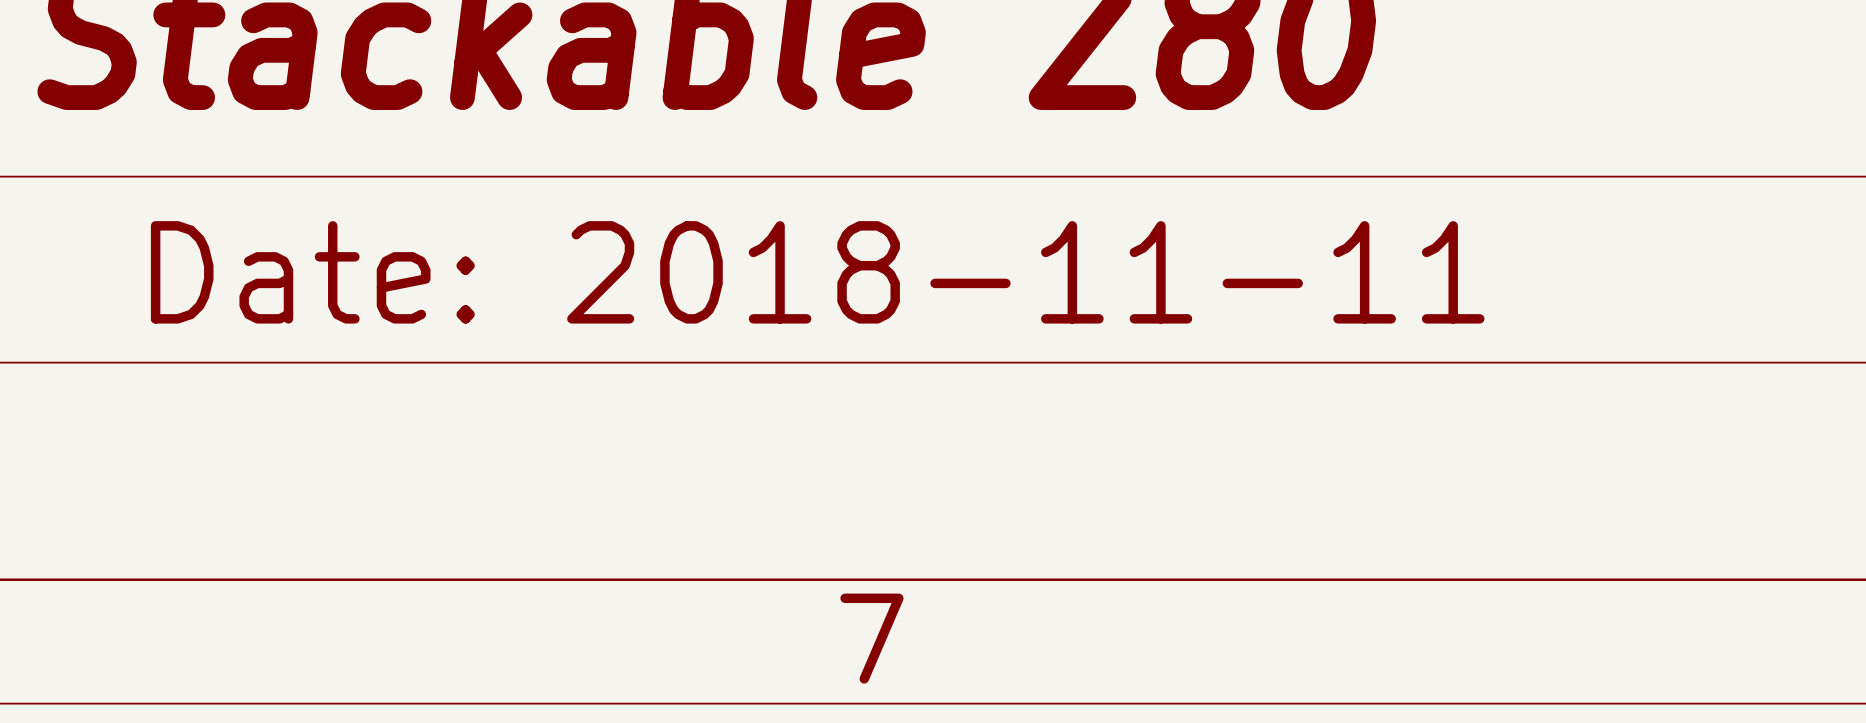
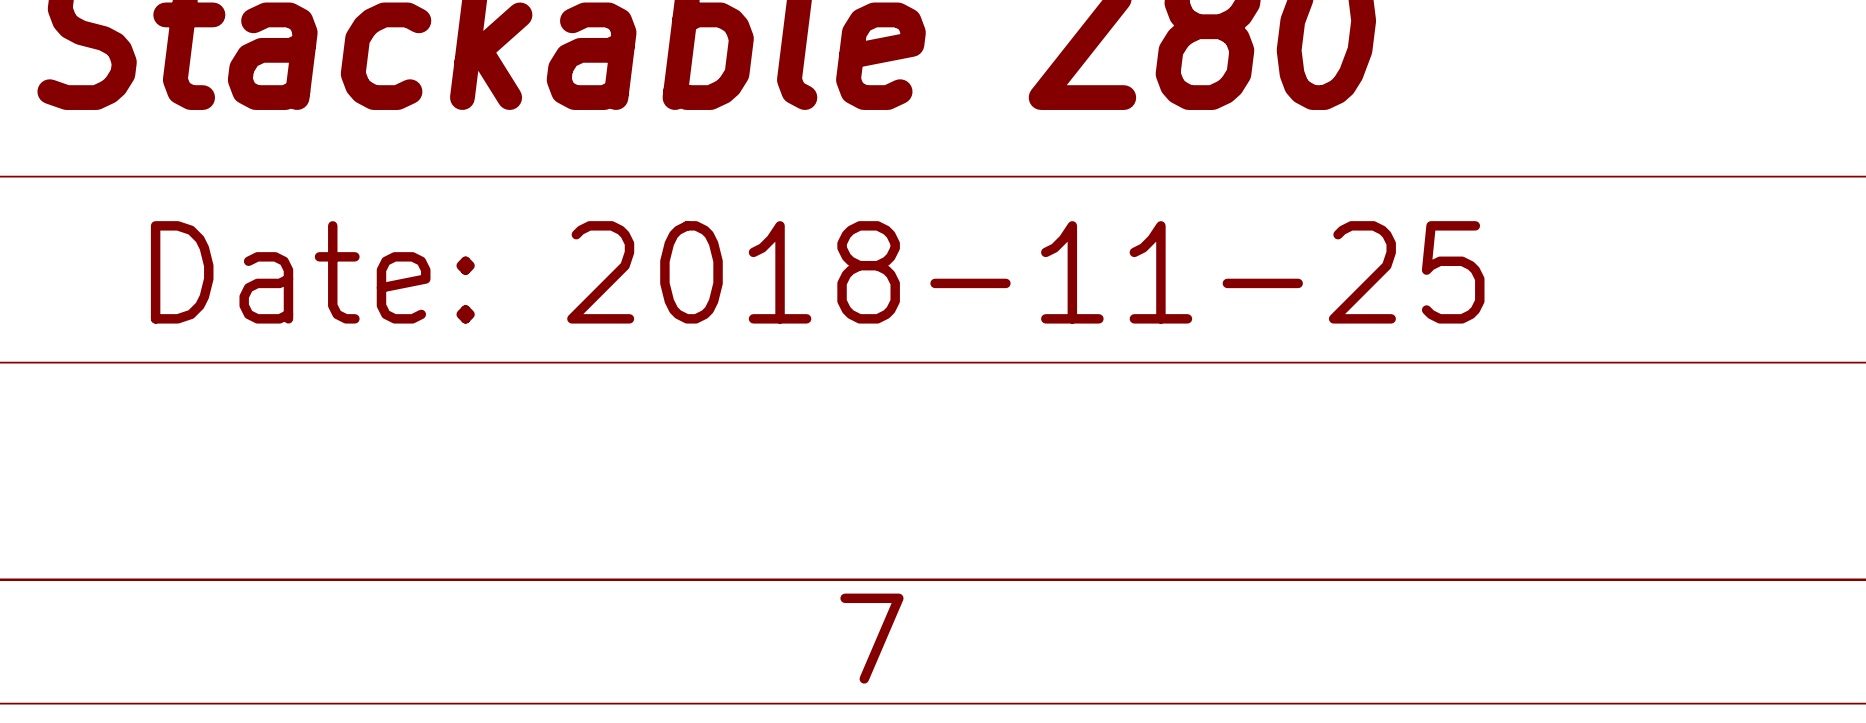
title block: Date: 2018-11-11 (817, 272) -> Date: 2018-11-25 (817, 272)

